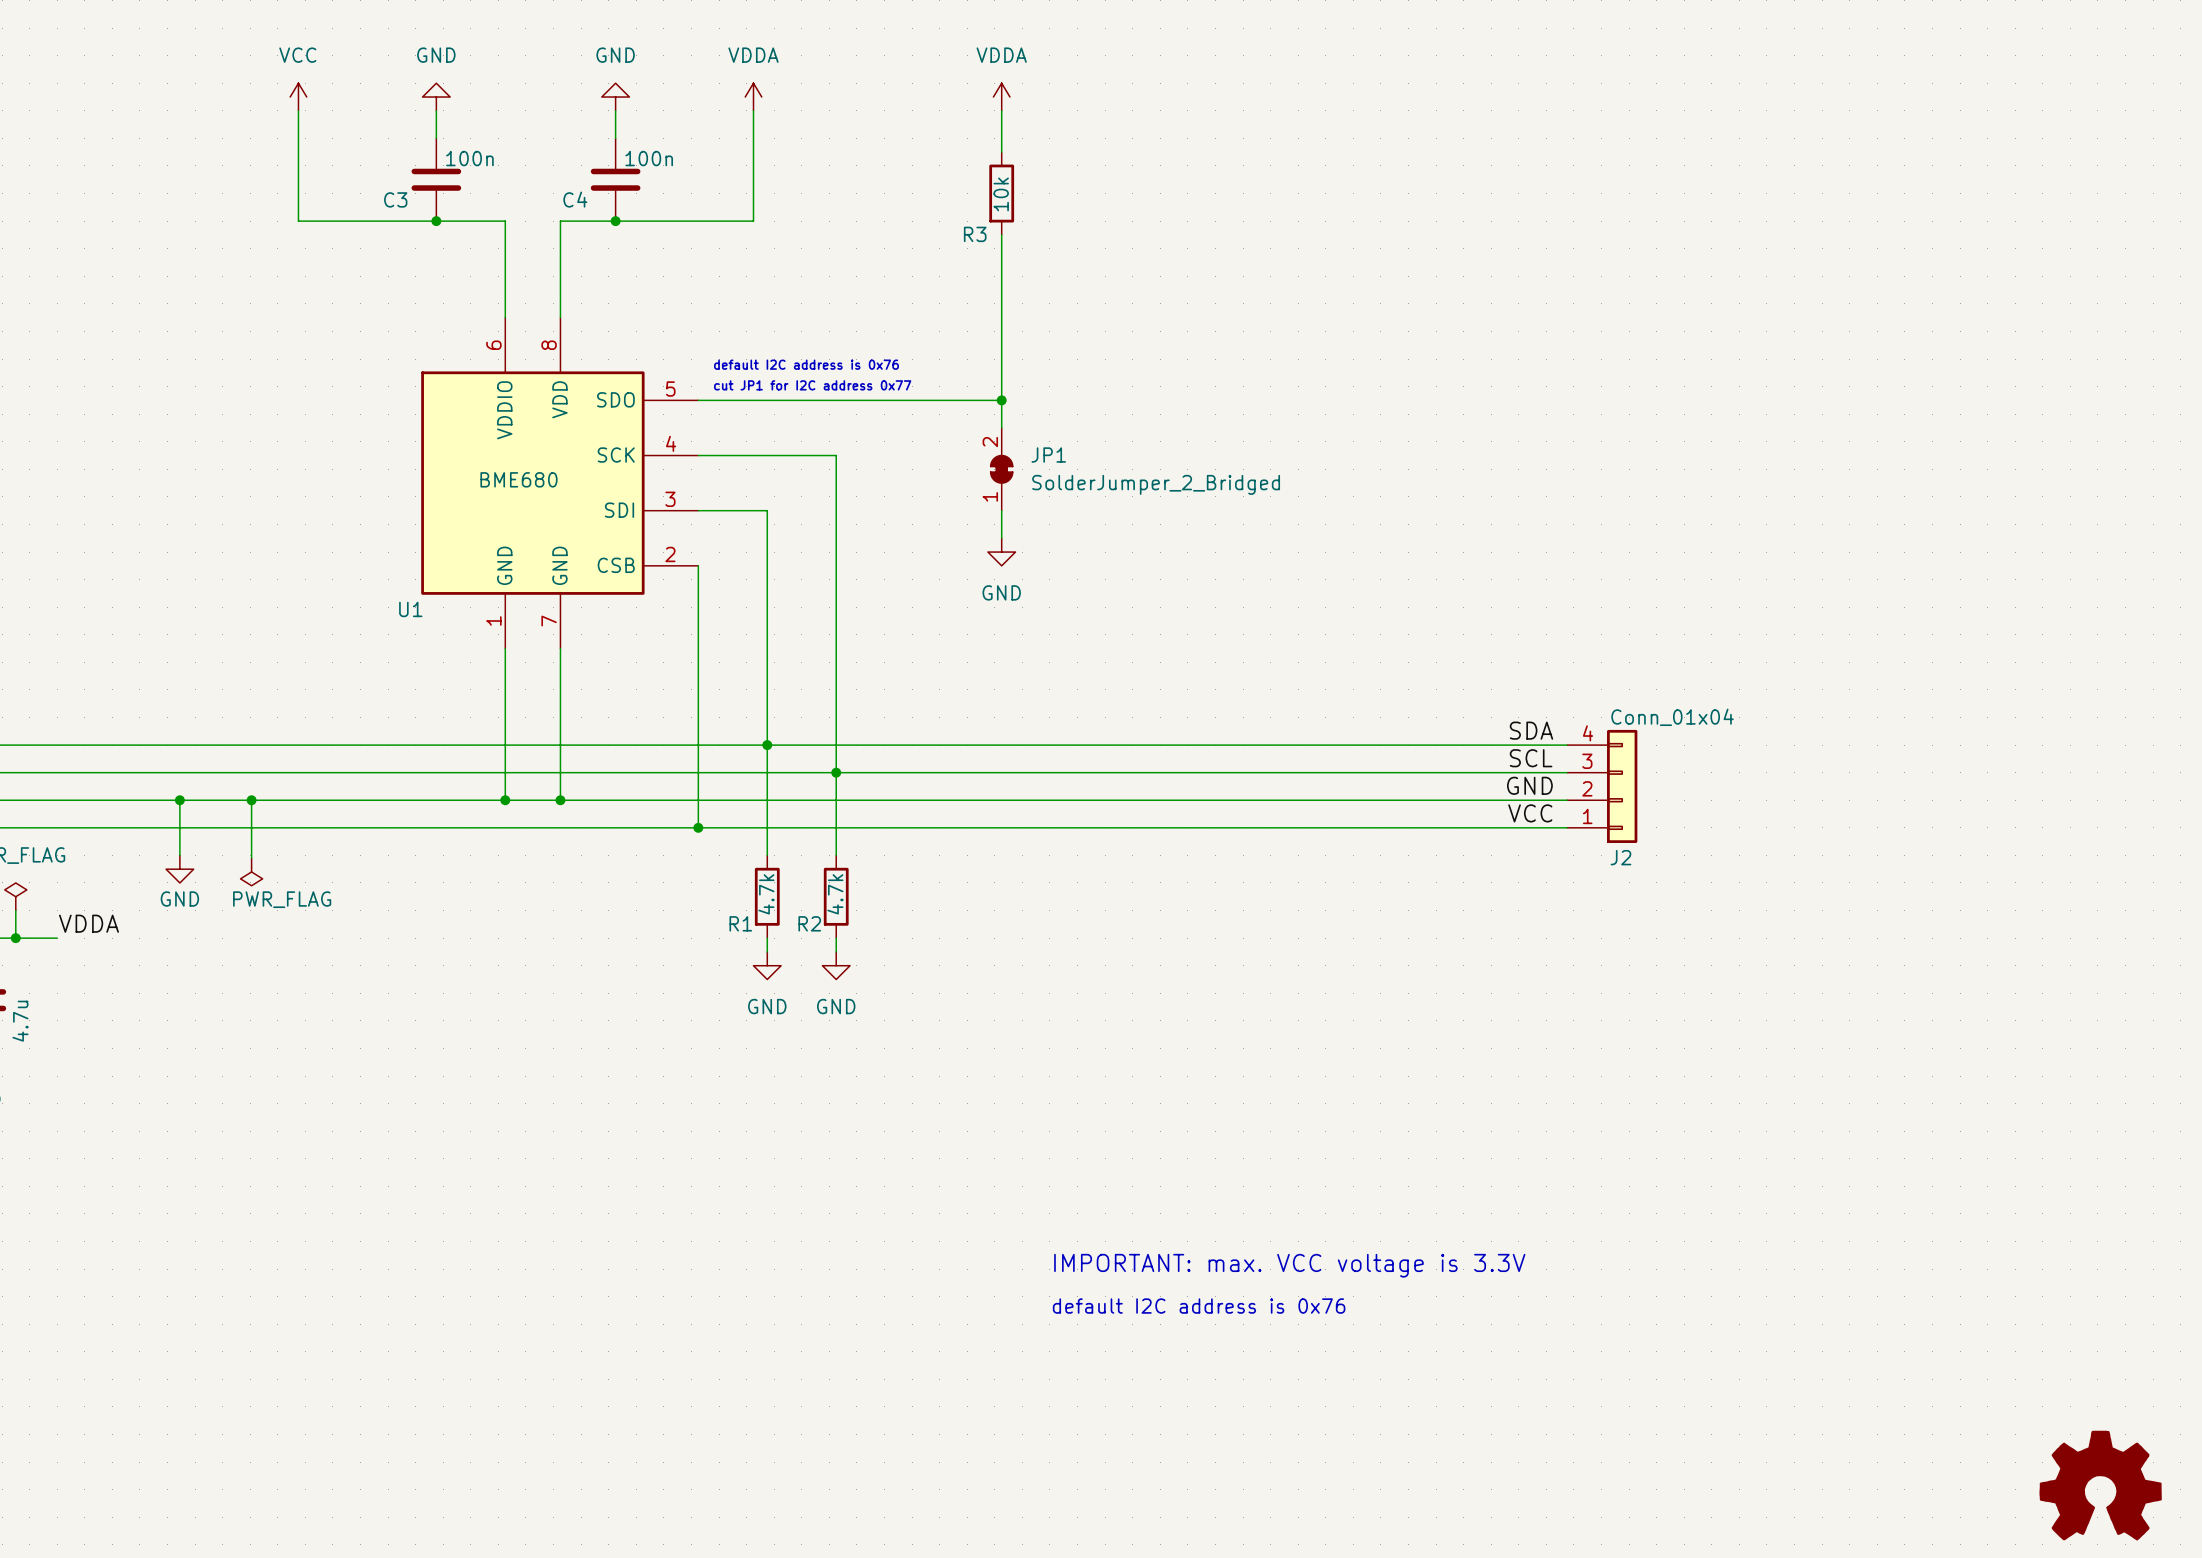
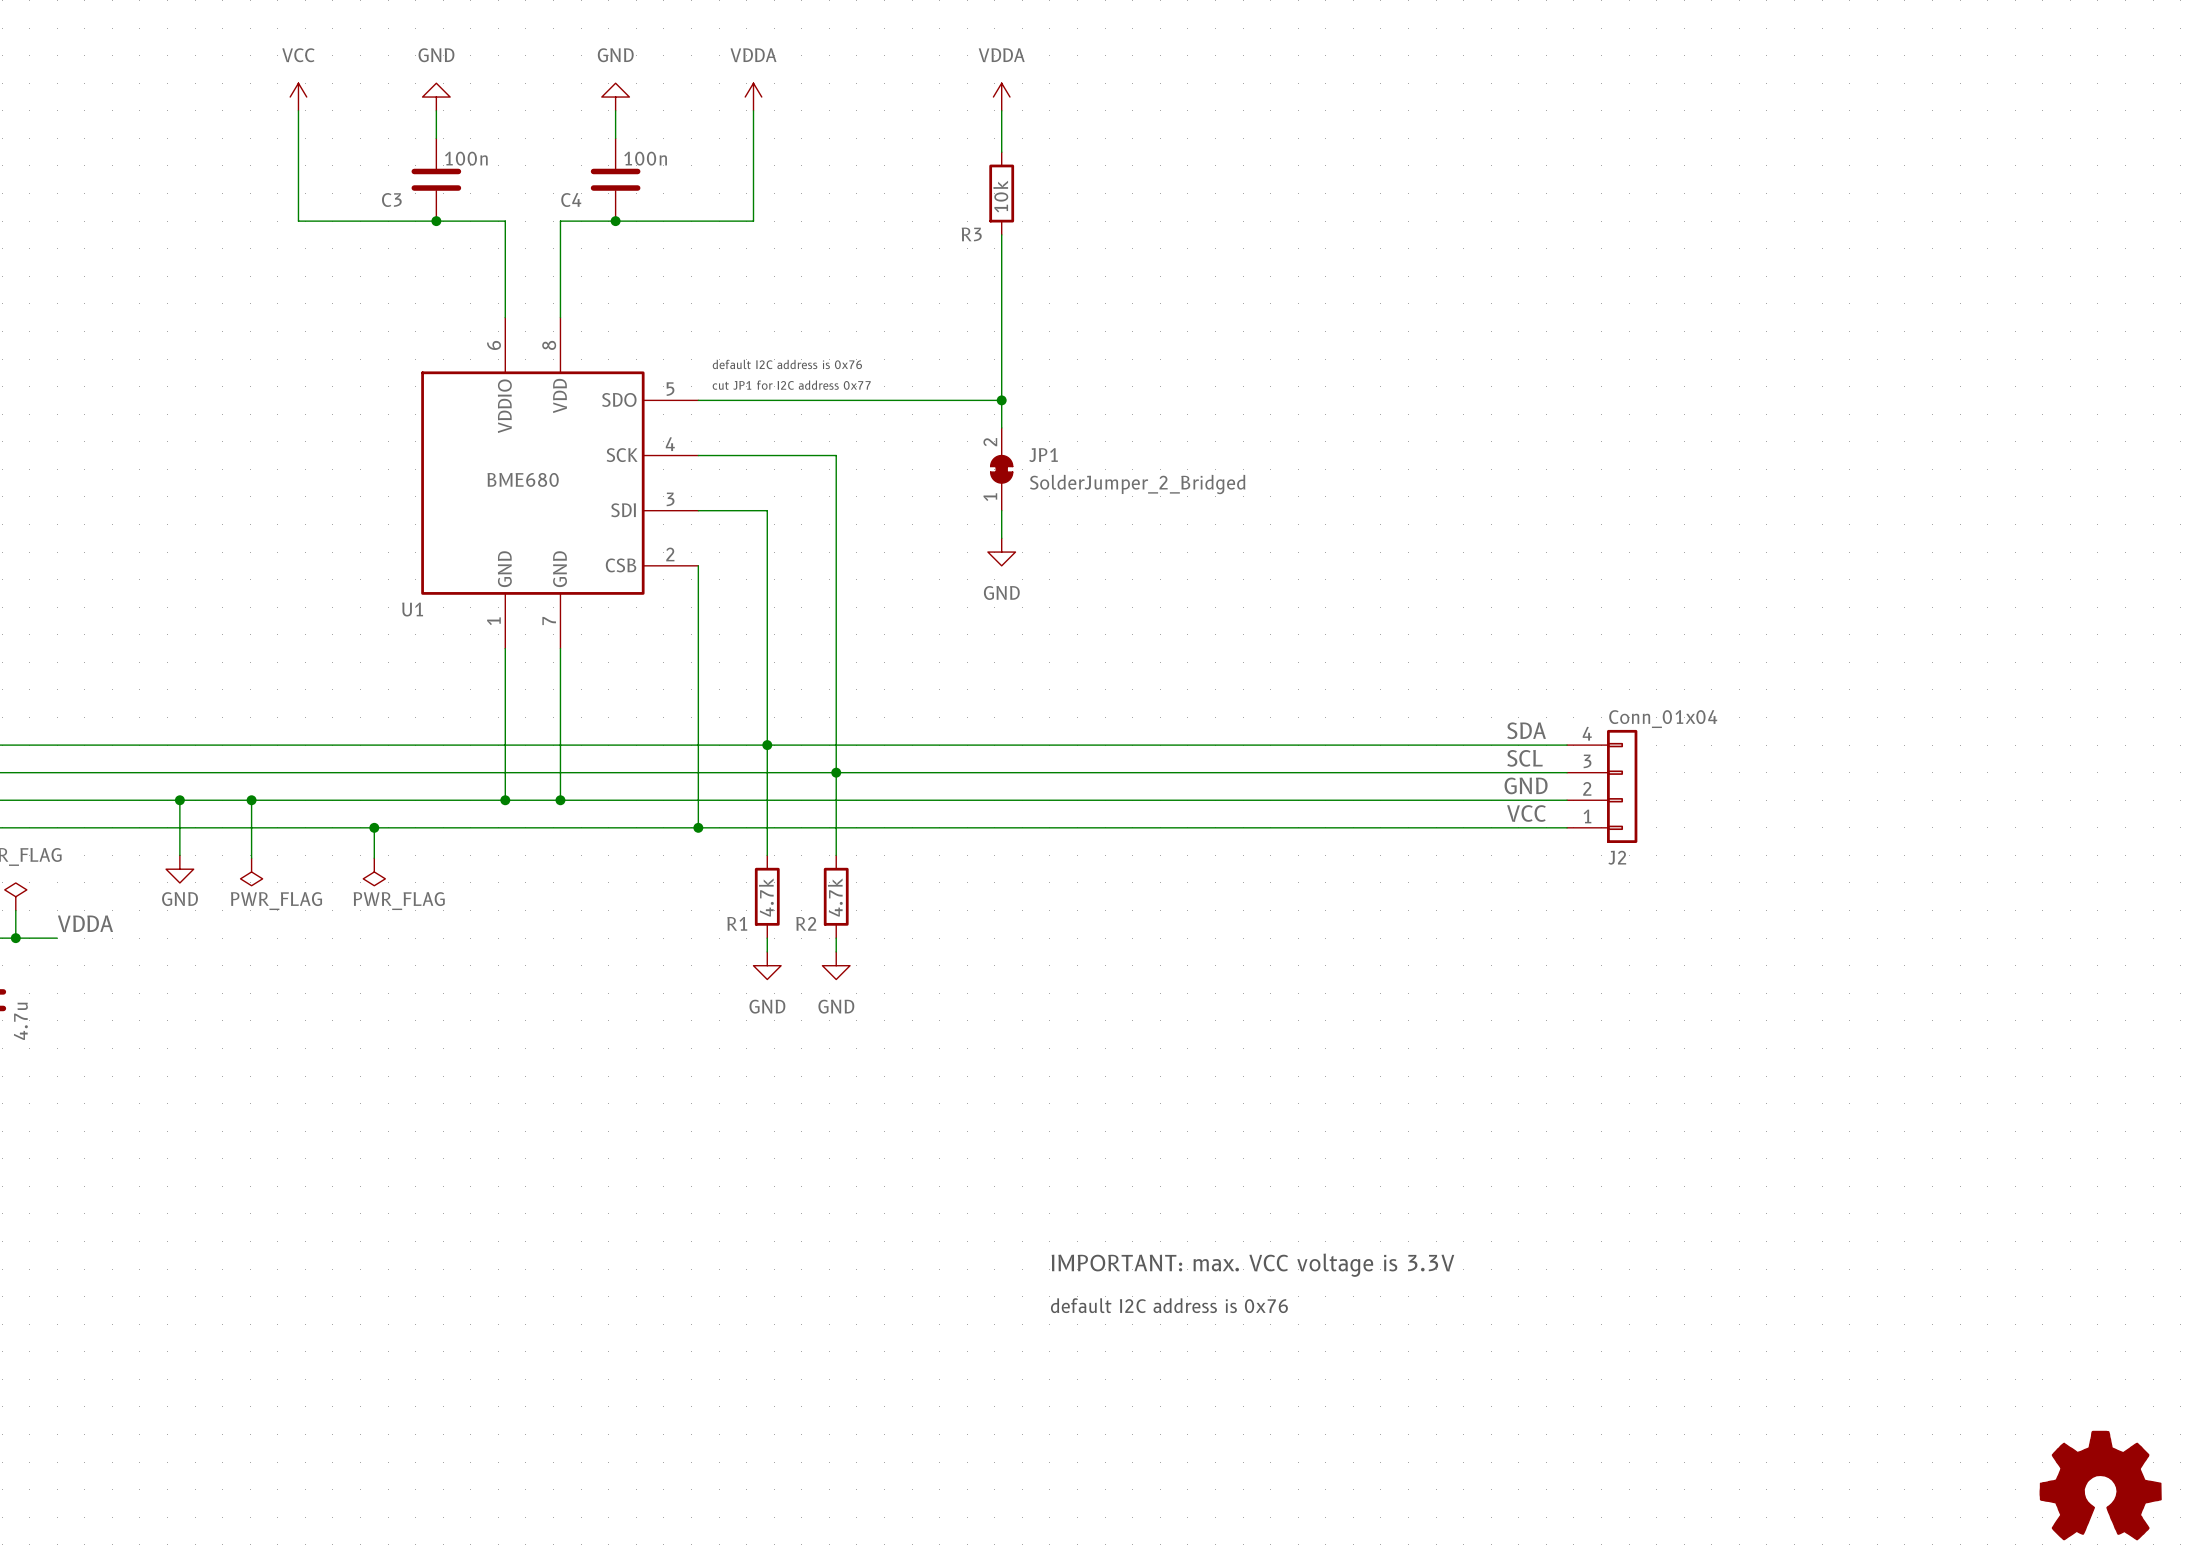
wire: none -> (374, 827) (374, 858)
junction: none -> (374, 827)
power symbol: none -> PWR_FLAG (374, 871)

